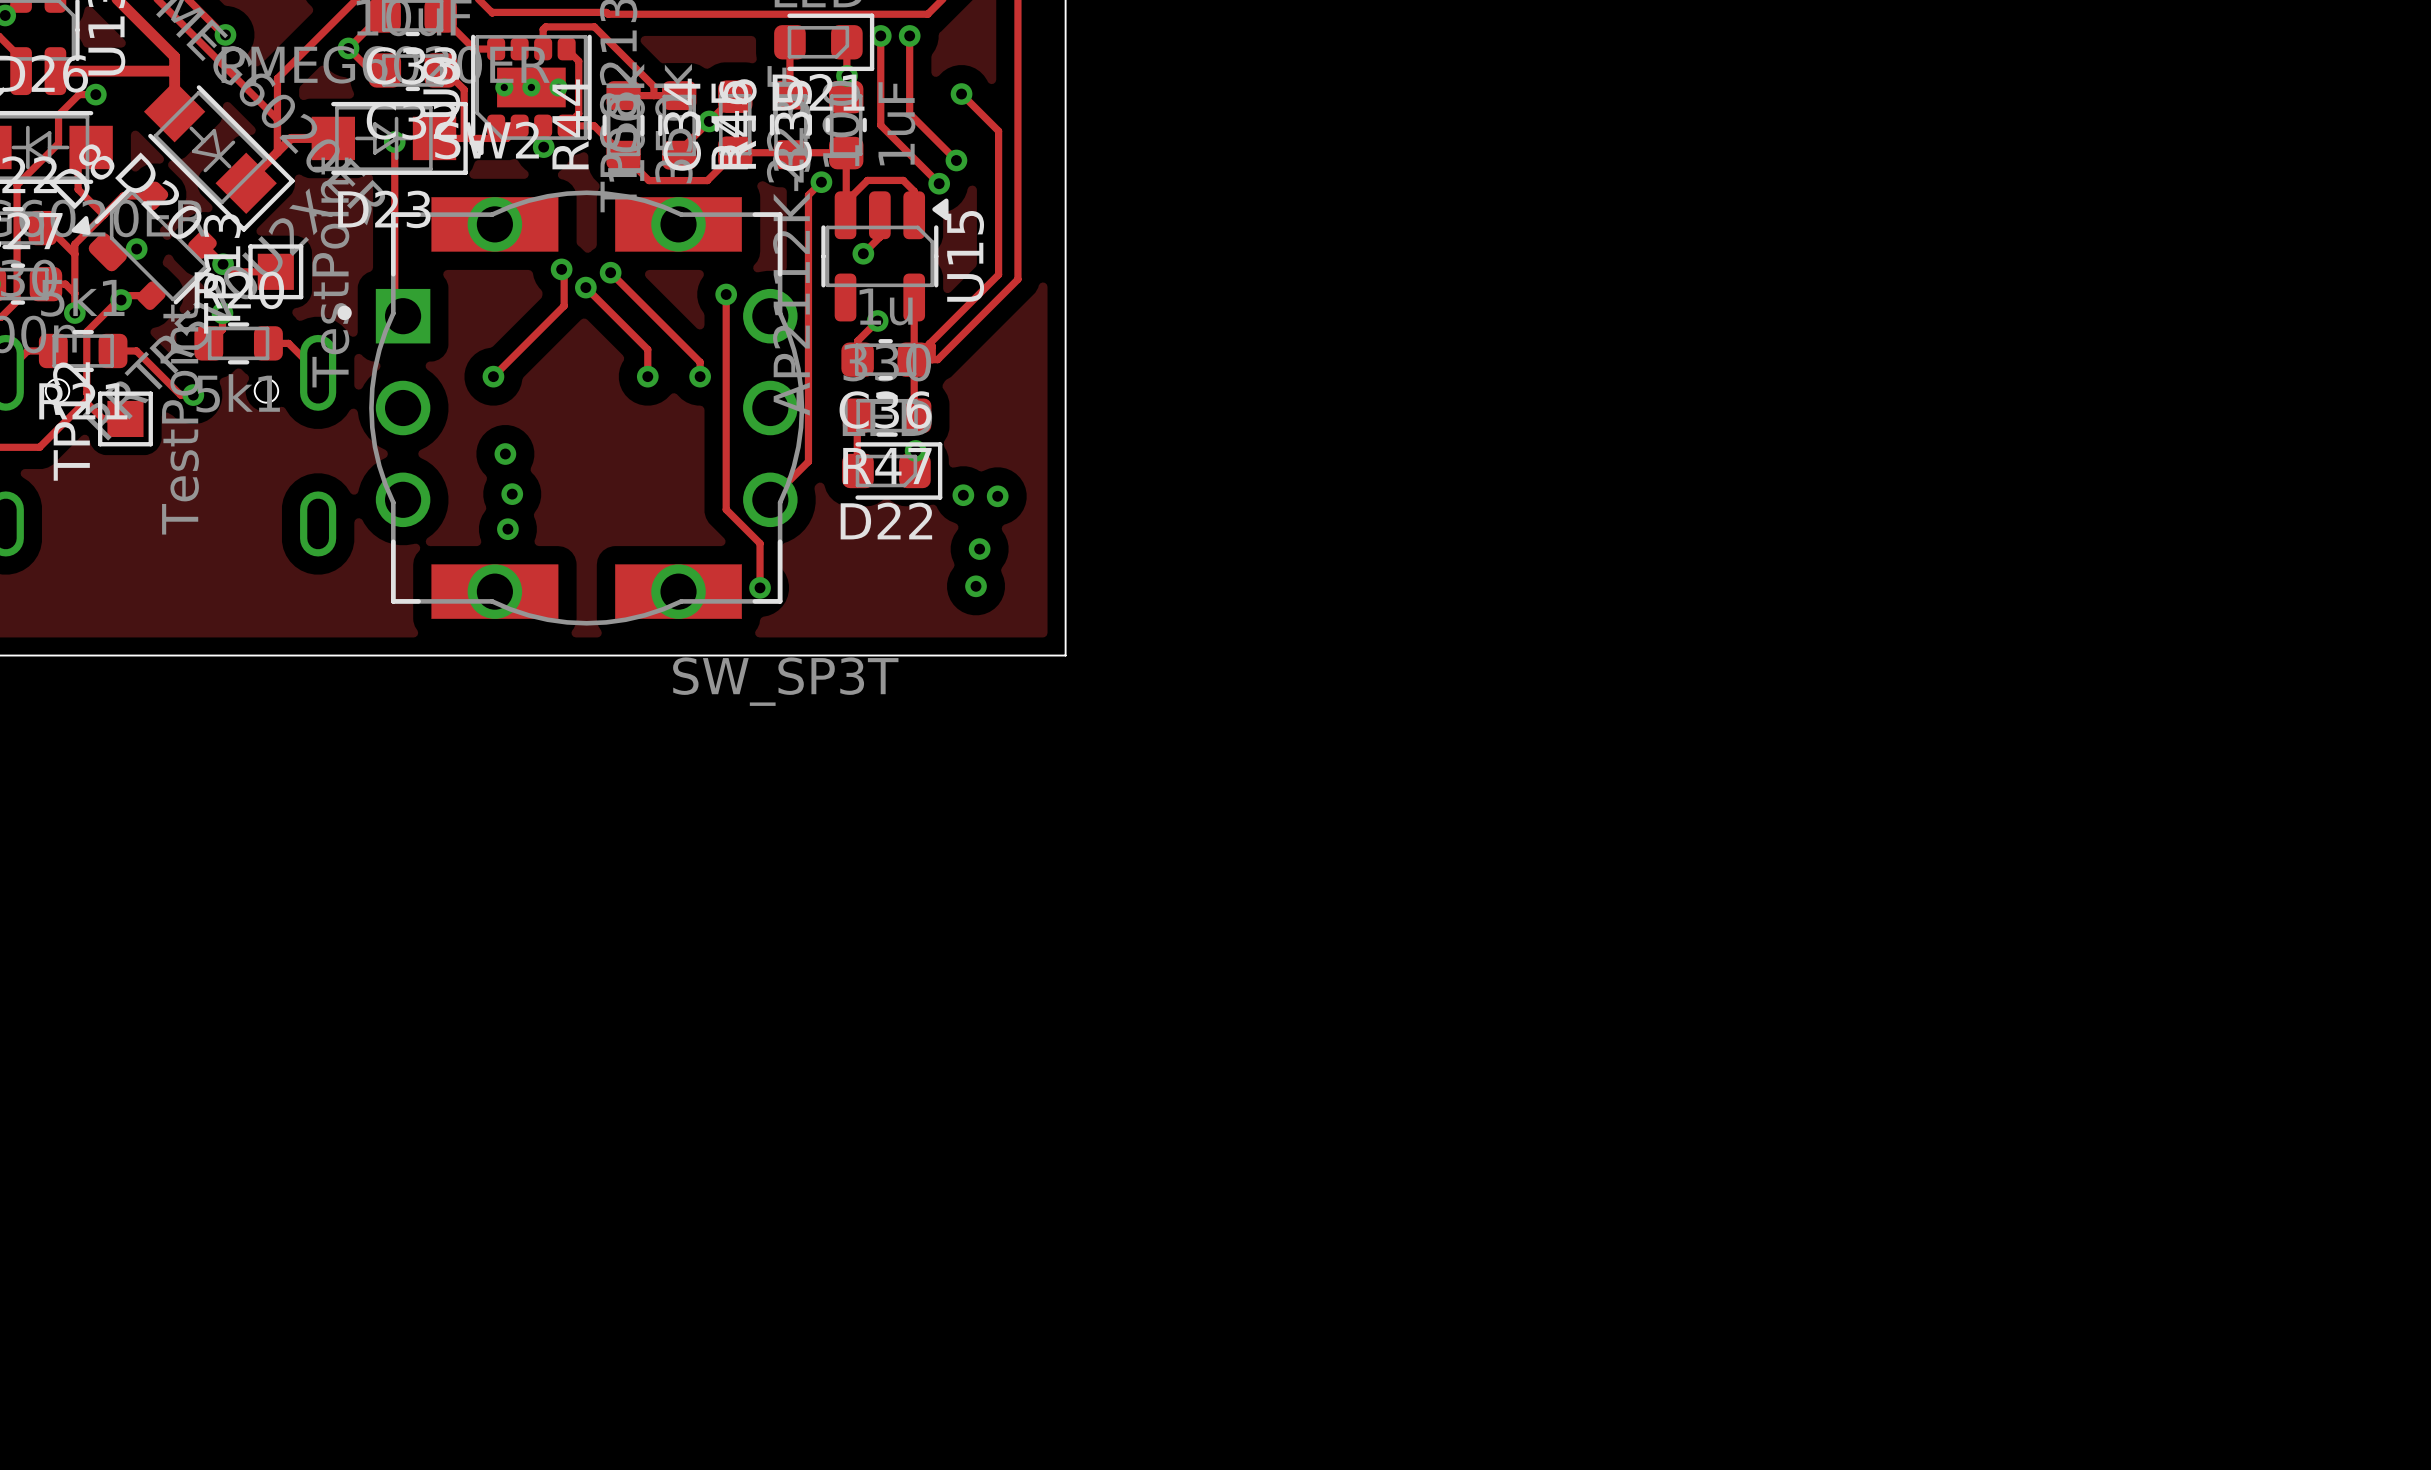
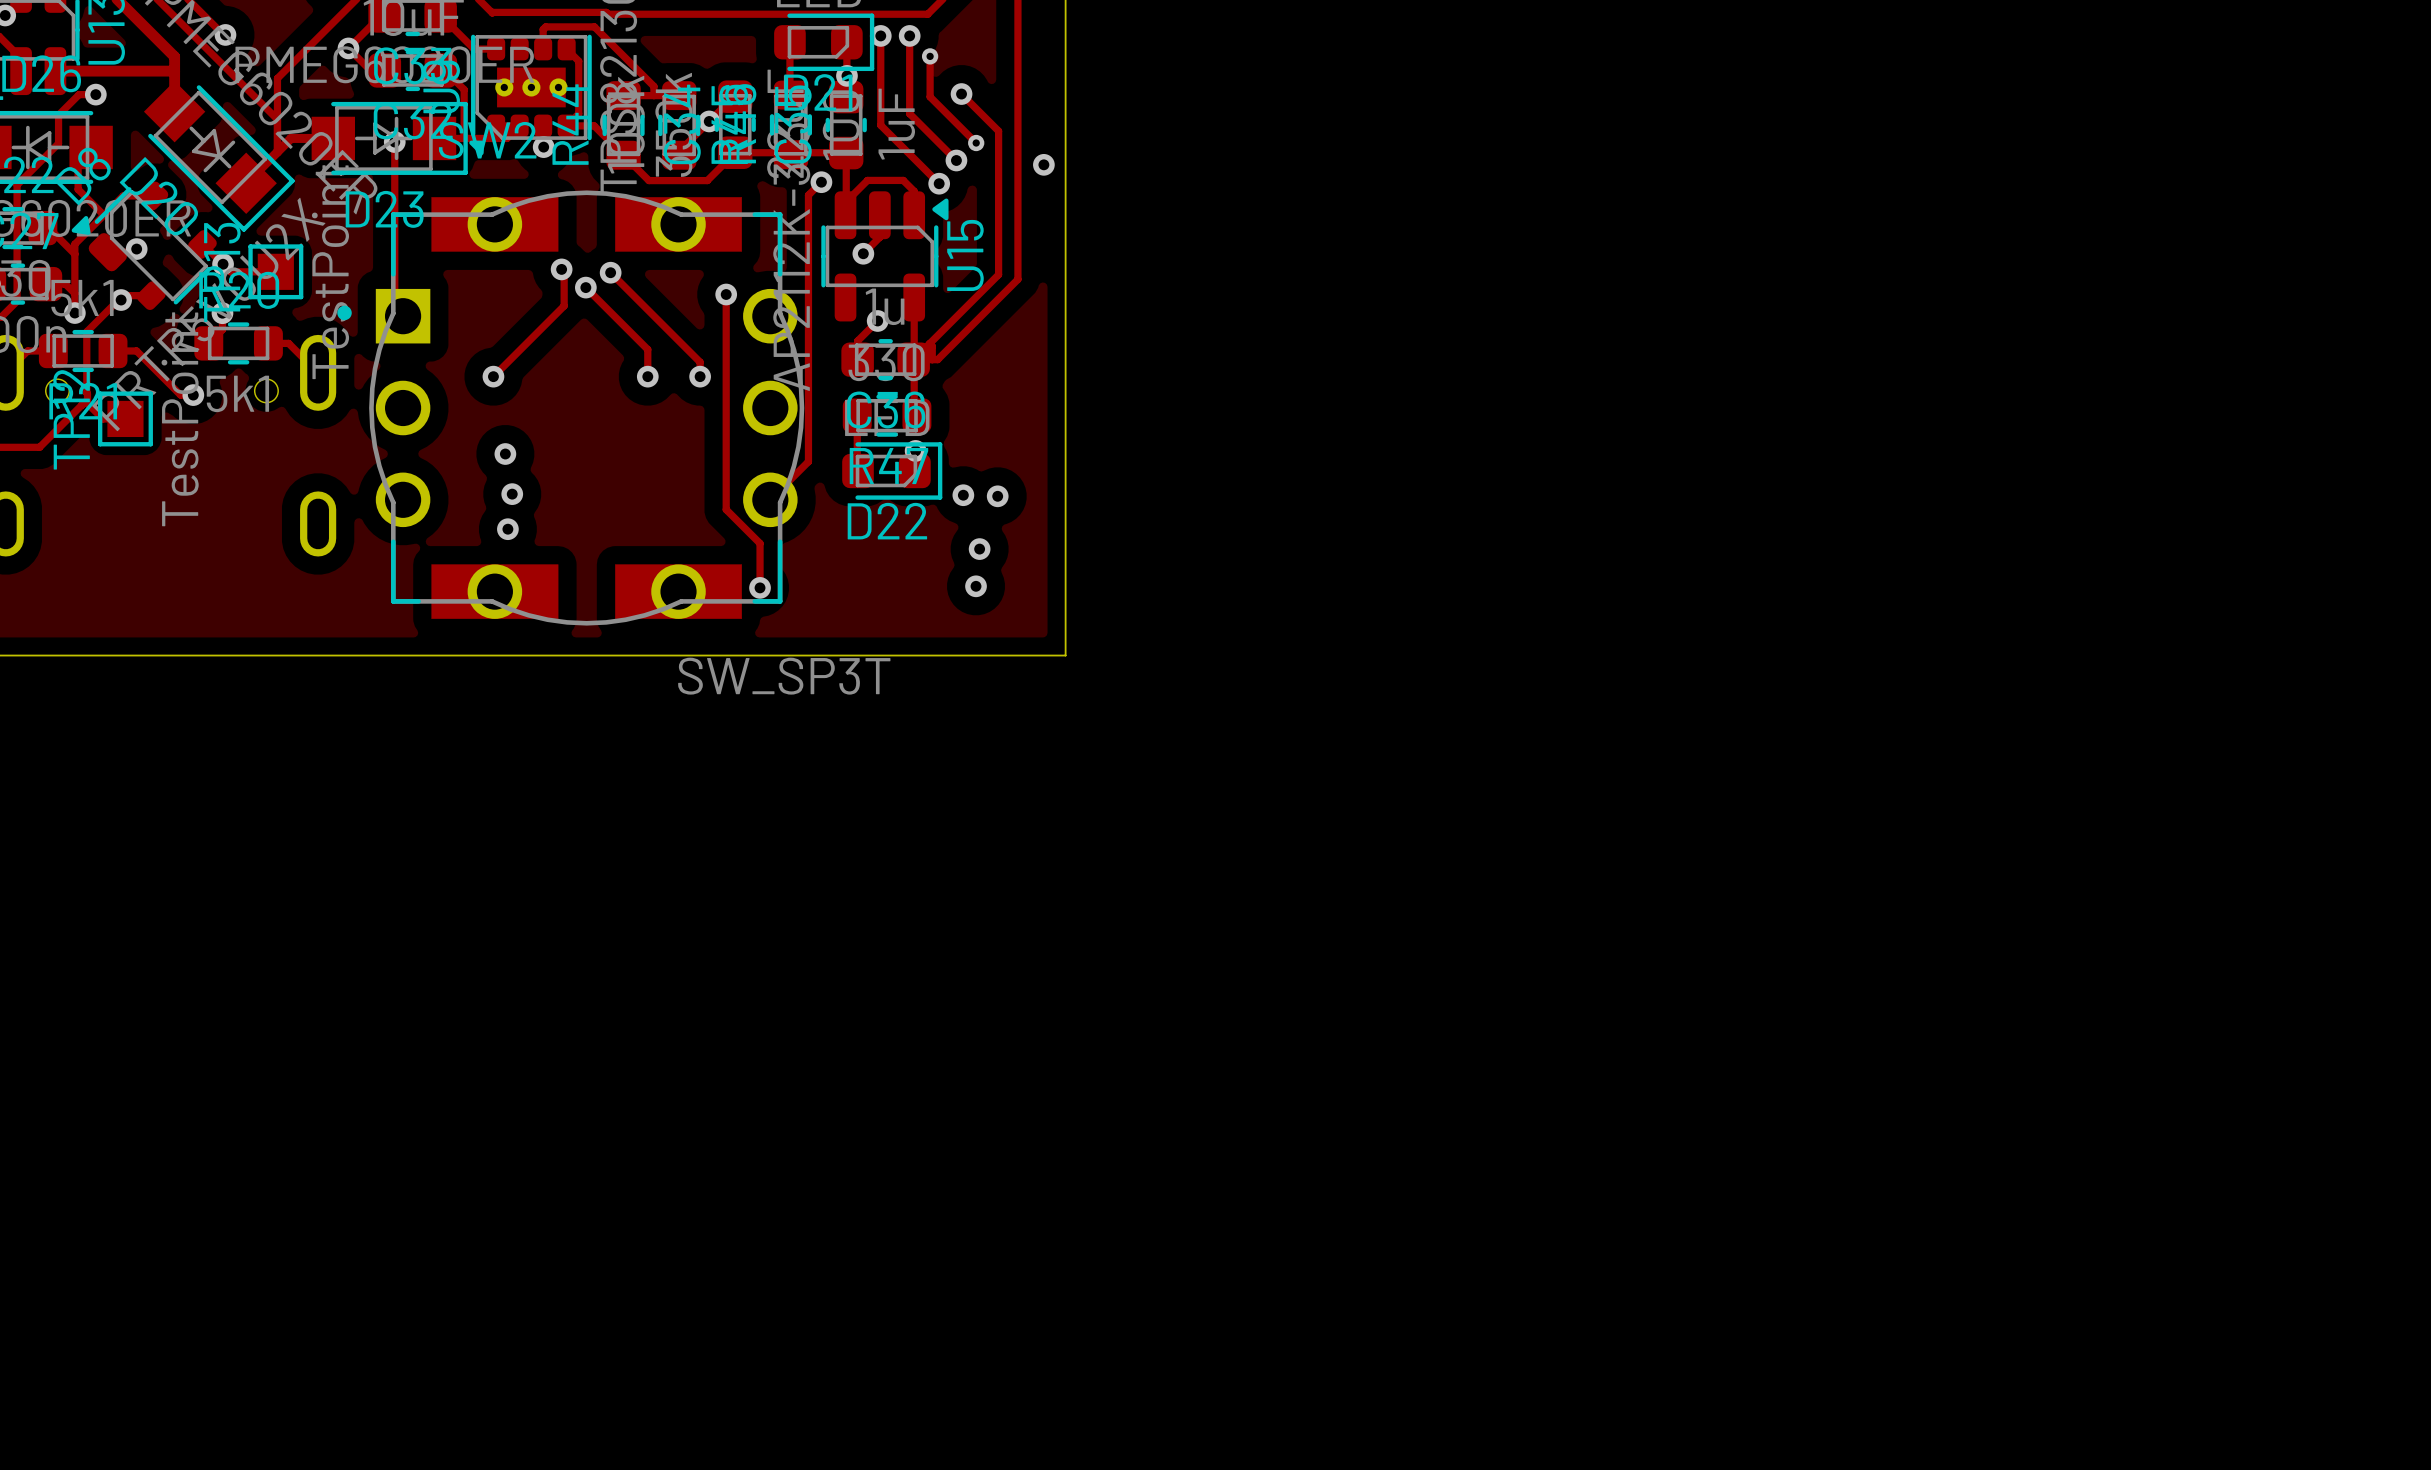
track: none -> (930, 56) (930, 96) (976, 143)
via: none -> (930, 56)
via: none -> (976, 143)
via: none -> (1043, 164)

